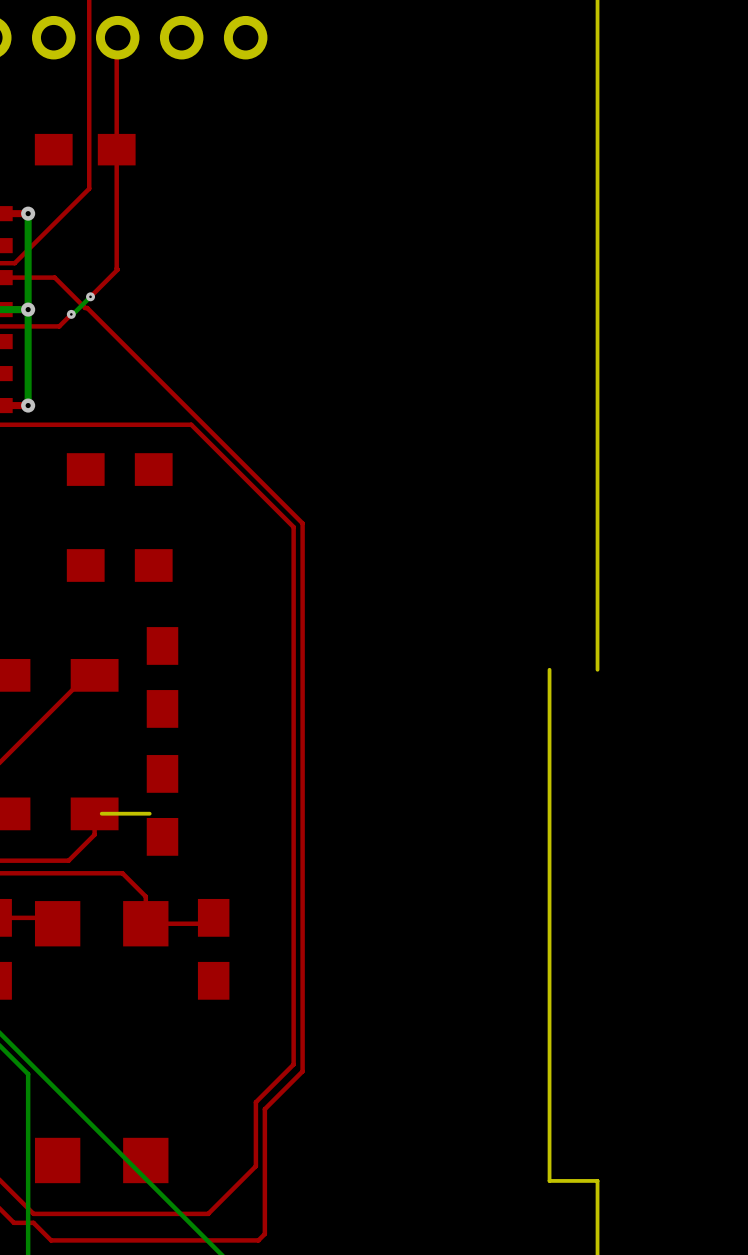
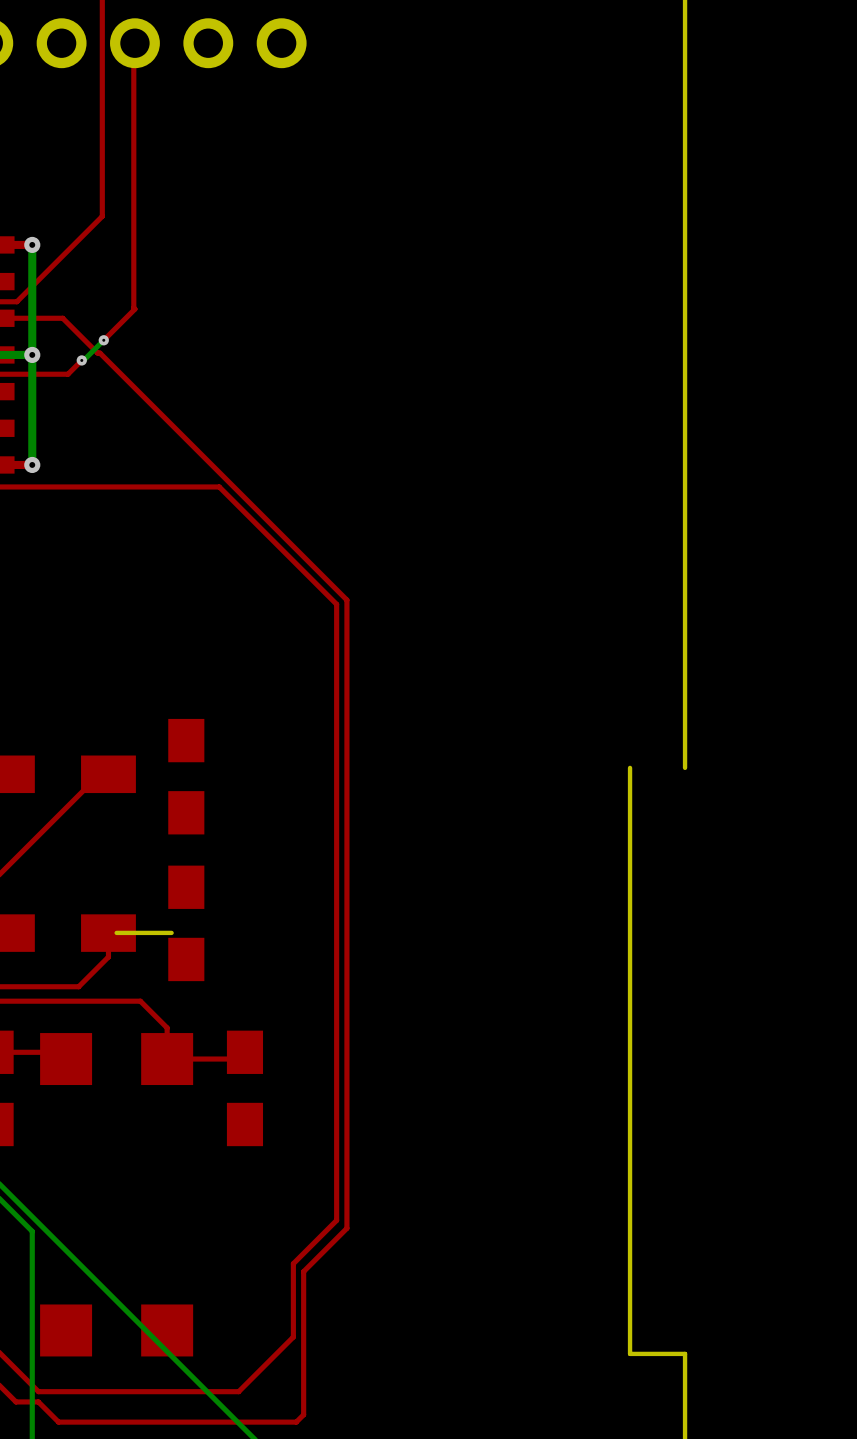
part: (85, 149) -> none
part: (119, 469) -> none
part: (119, 565) -> none

